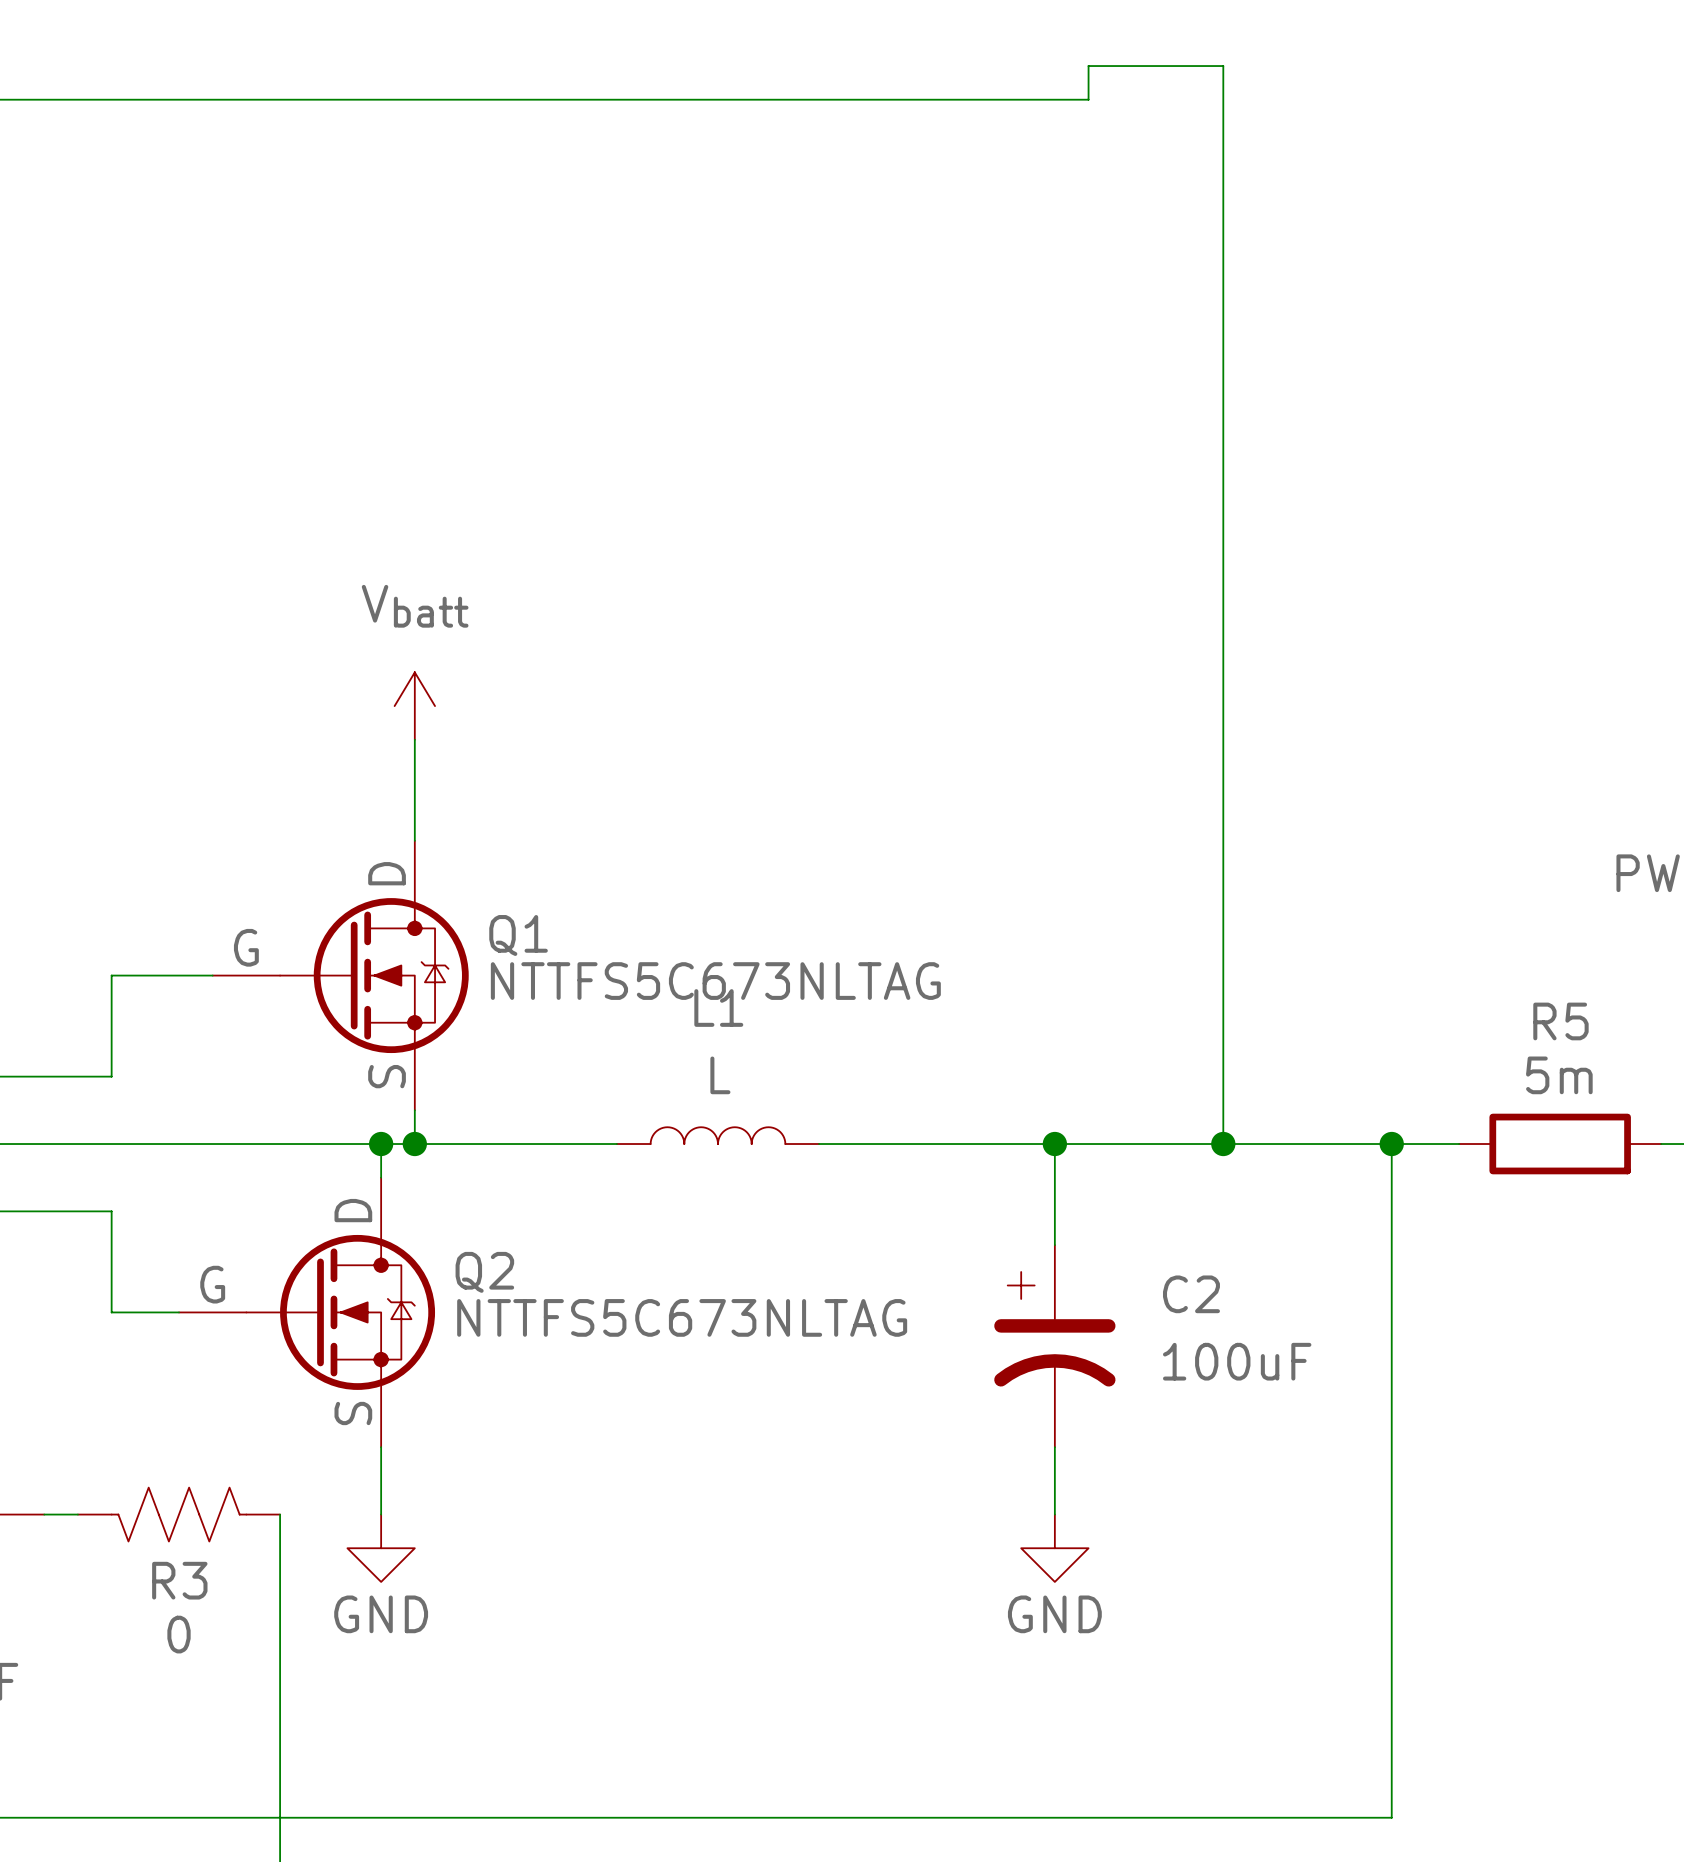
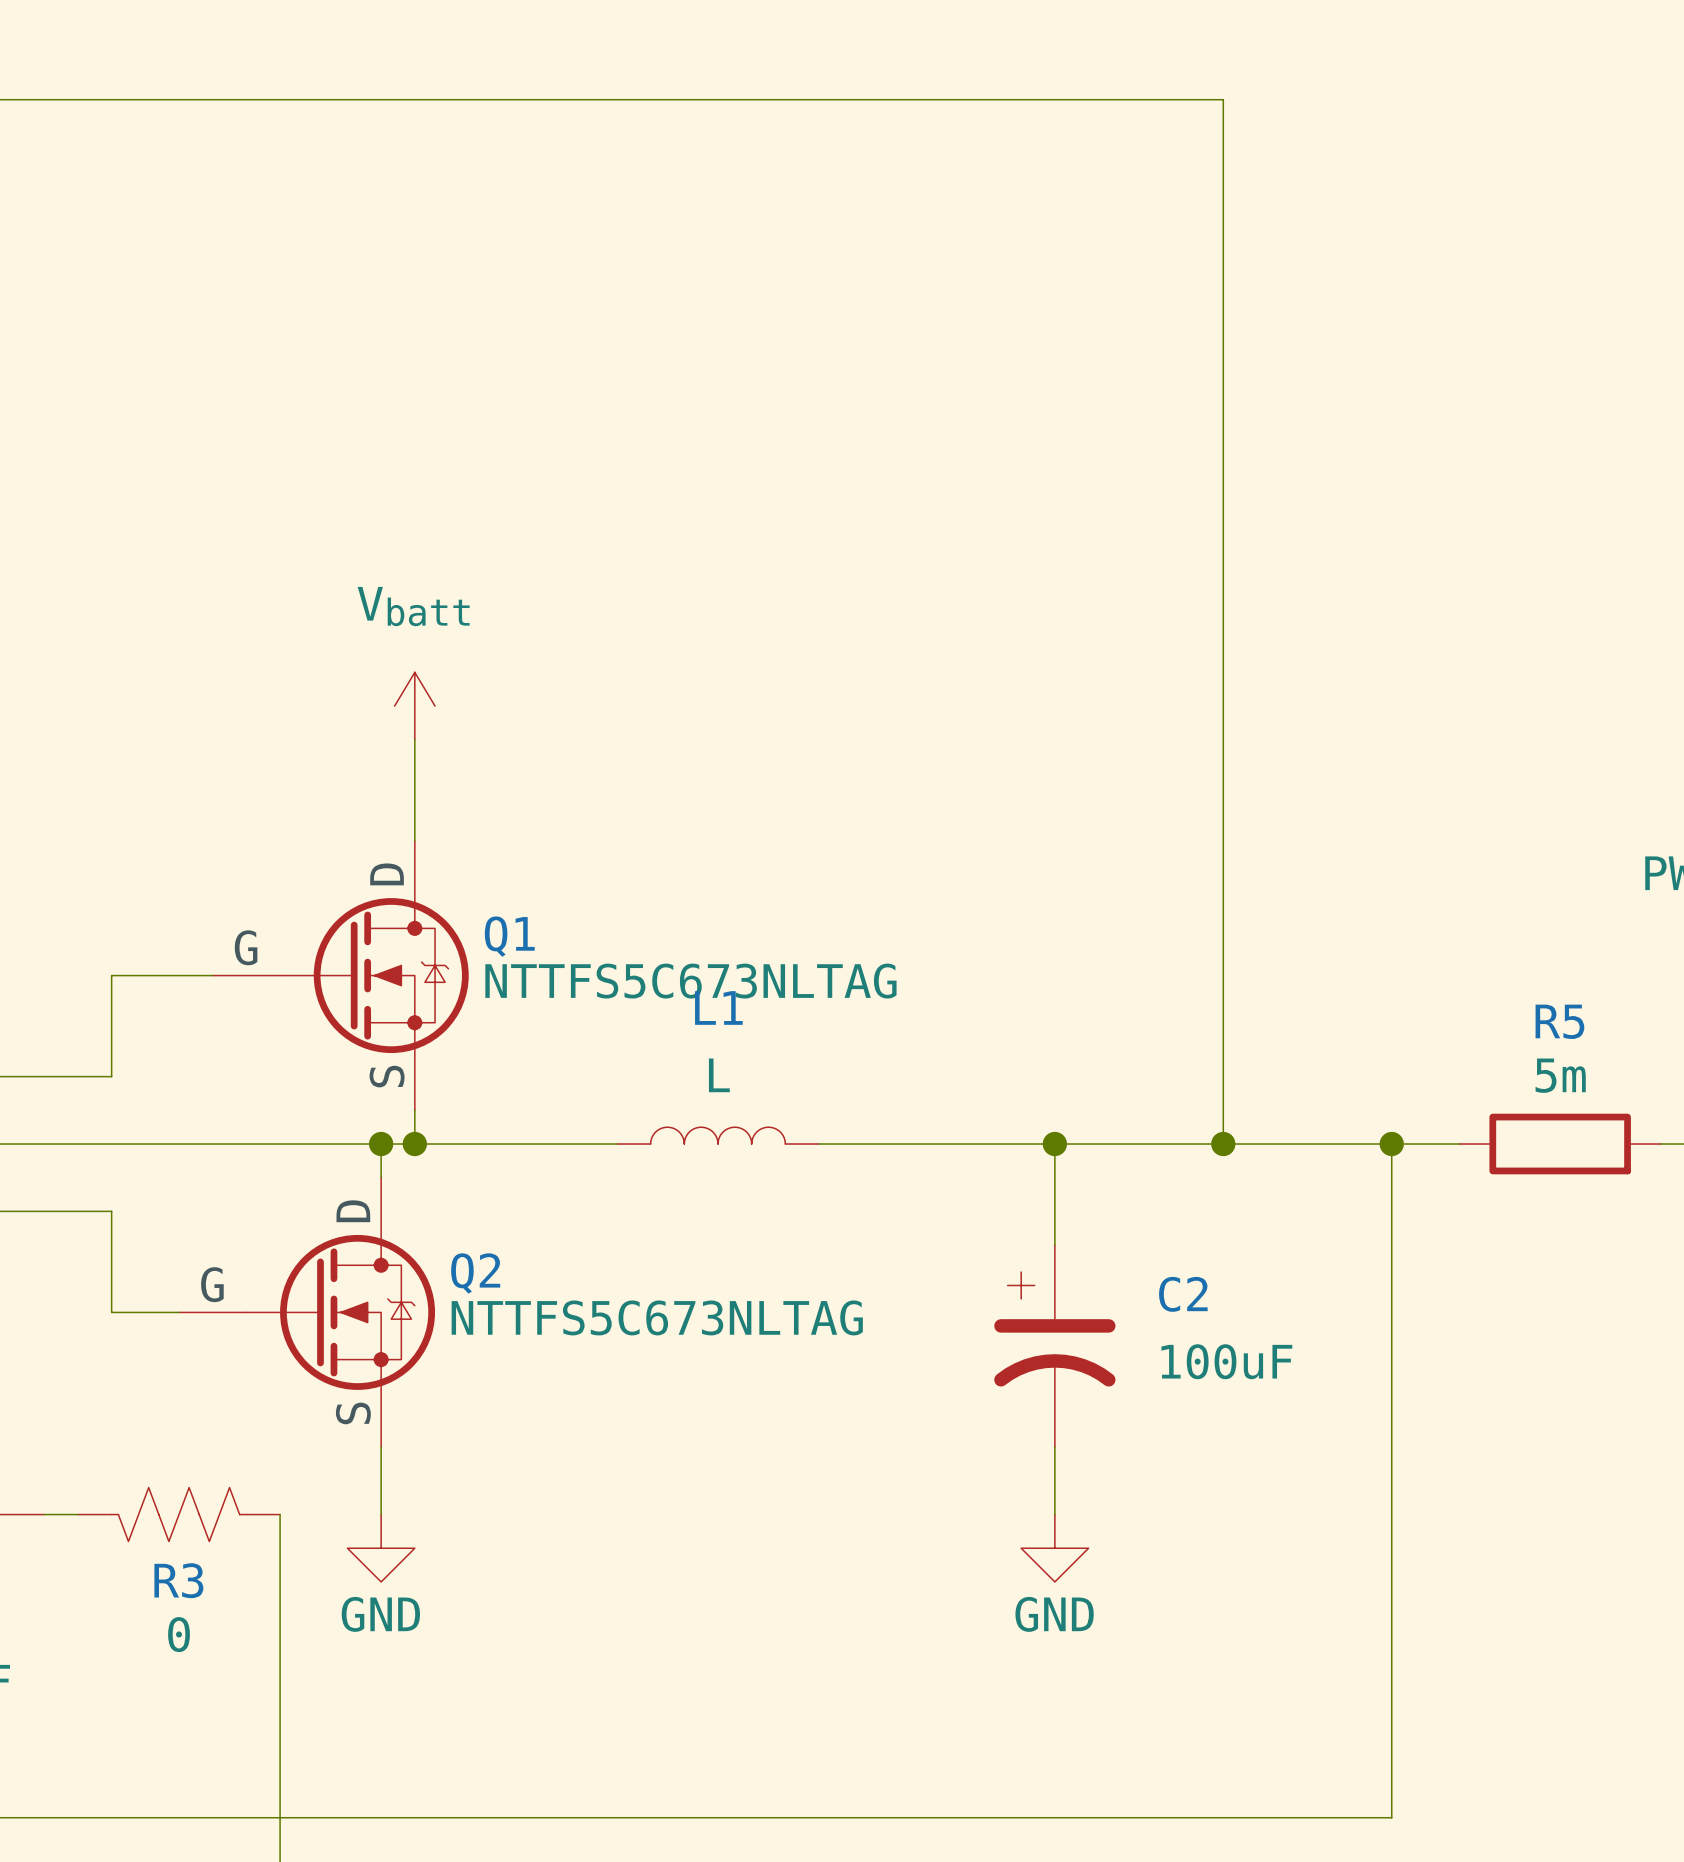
wire: (1088, 99) (1088, 66) (1223, 66) (1223, 99) -> (1088, 99) (1223, 99)

